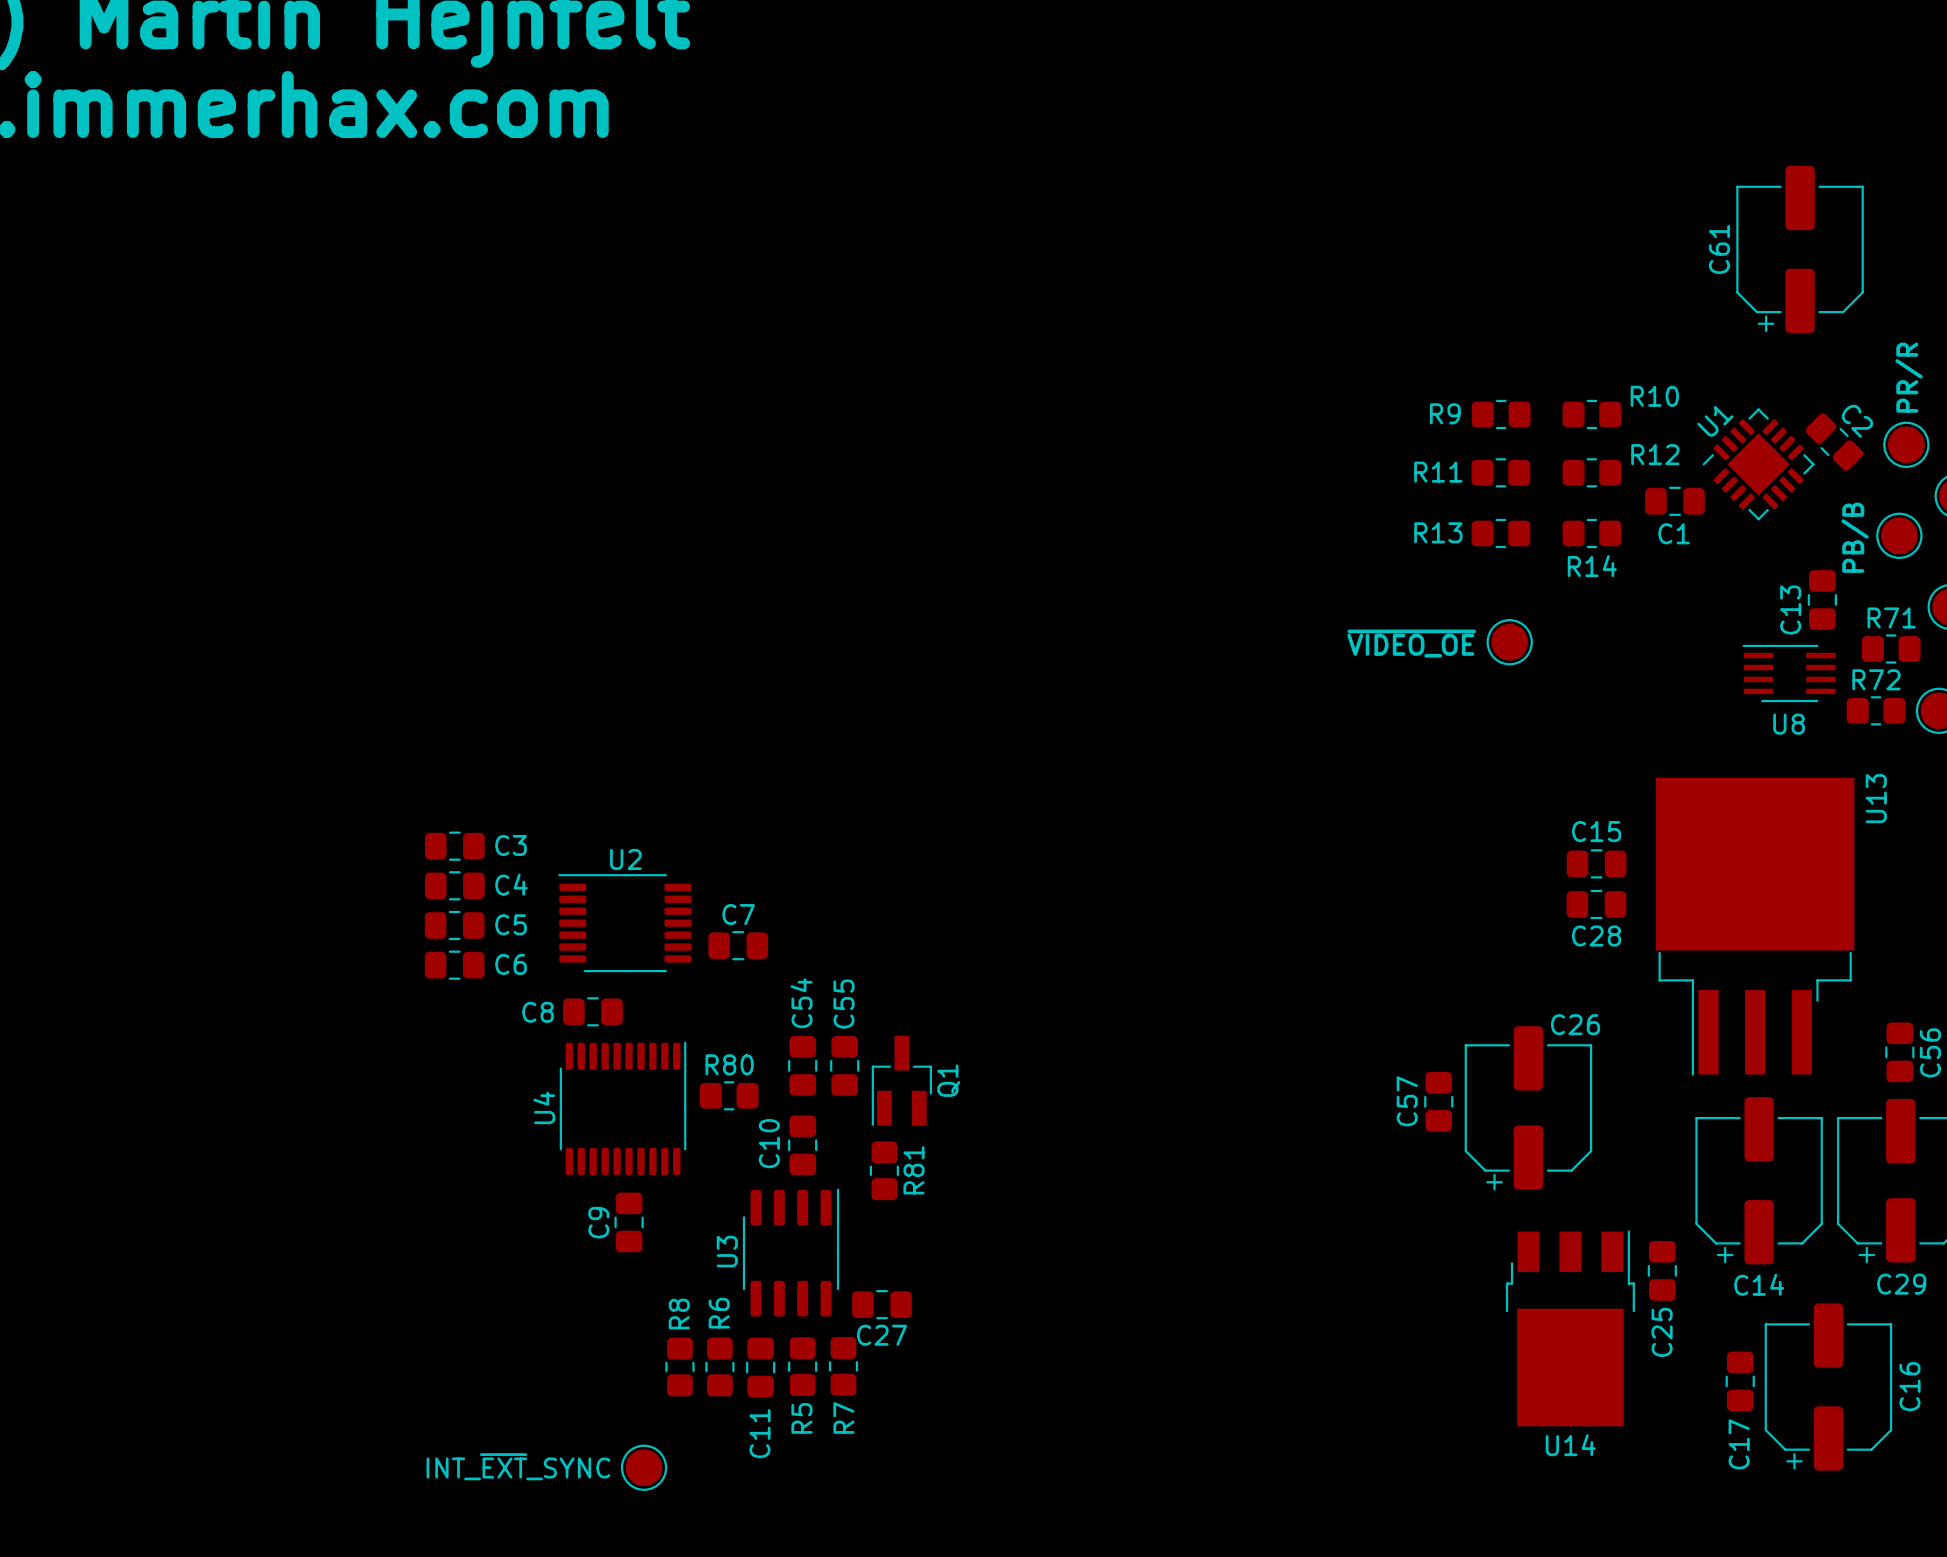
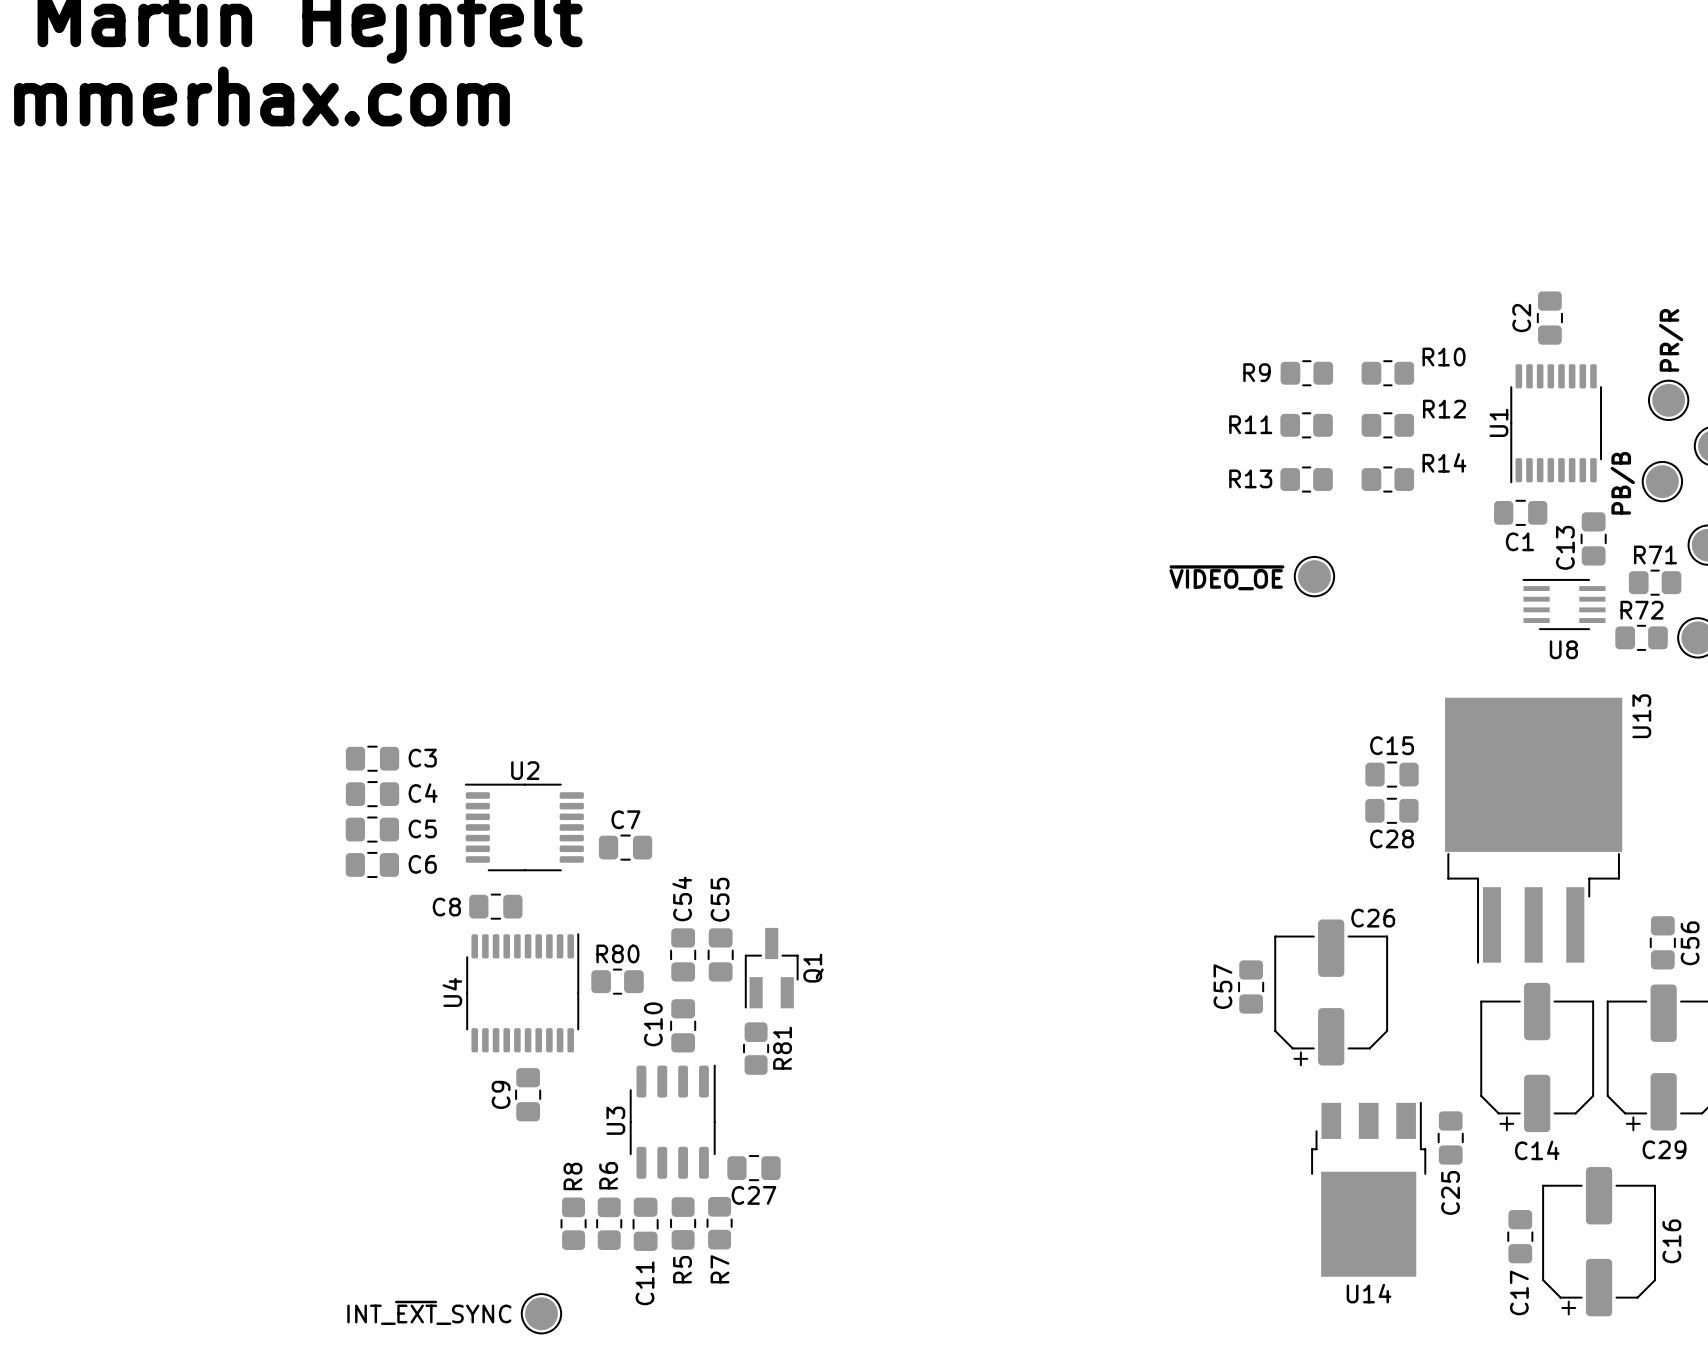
C61: (1800, 249) -> none
U1 footprint: [1702, 408, 1815, 521] -> [1510, 364, 1603, 484]
U1 name position: U1 (1715, 421) -> U1 (1498, 422)
C2 name position: C2 (1857, 421) -> C2 (1521, 318)
C2 rotation: 0° (1834, 442) -> 45° clockwise (1549, 318)
C2 position: (1834, 442) -> (1549, 318)
C1 position: (1674, 501) -> (1520, 512)
R14 name position: R14 (1592, 566) -> R14 (1444, 462)

